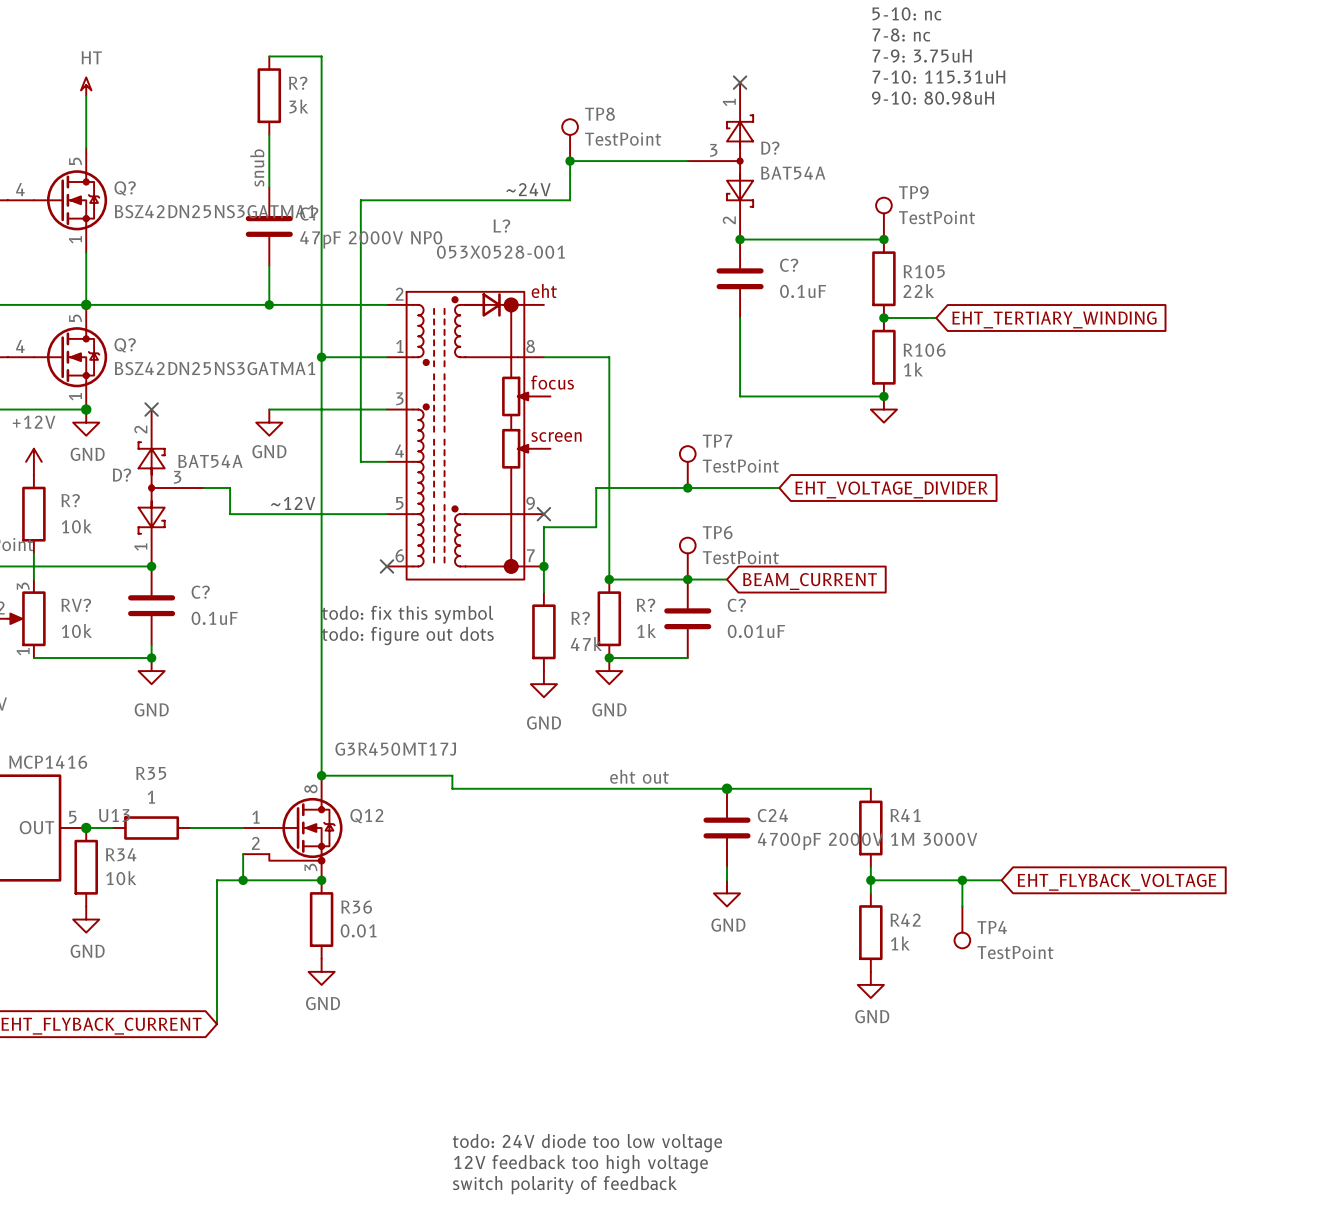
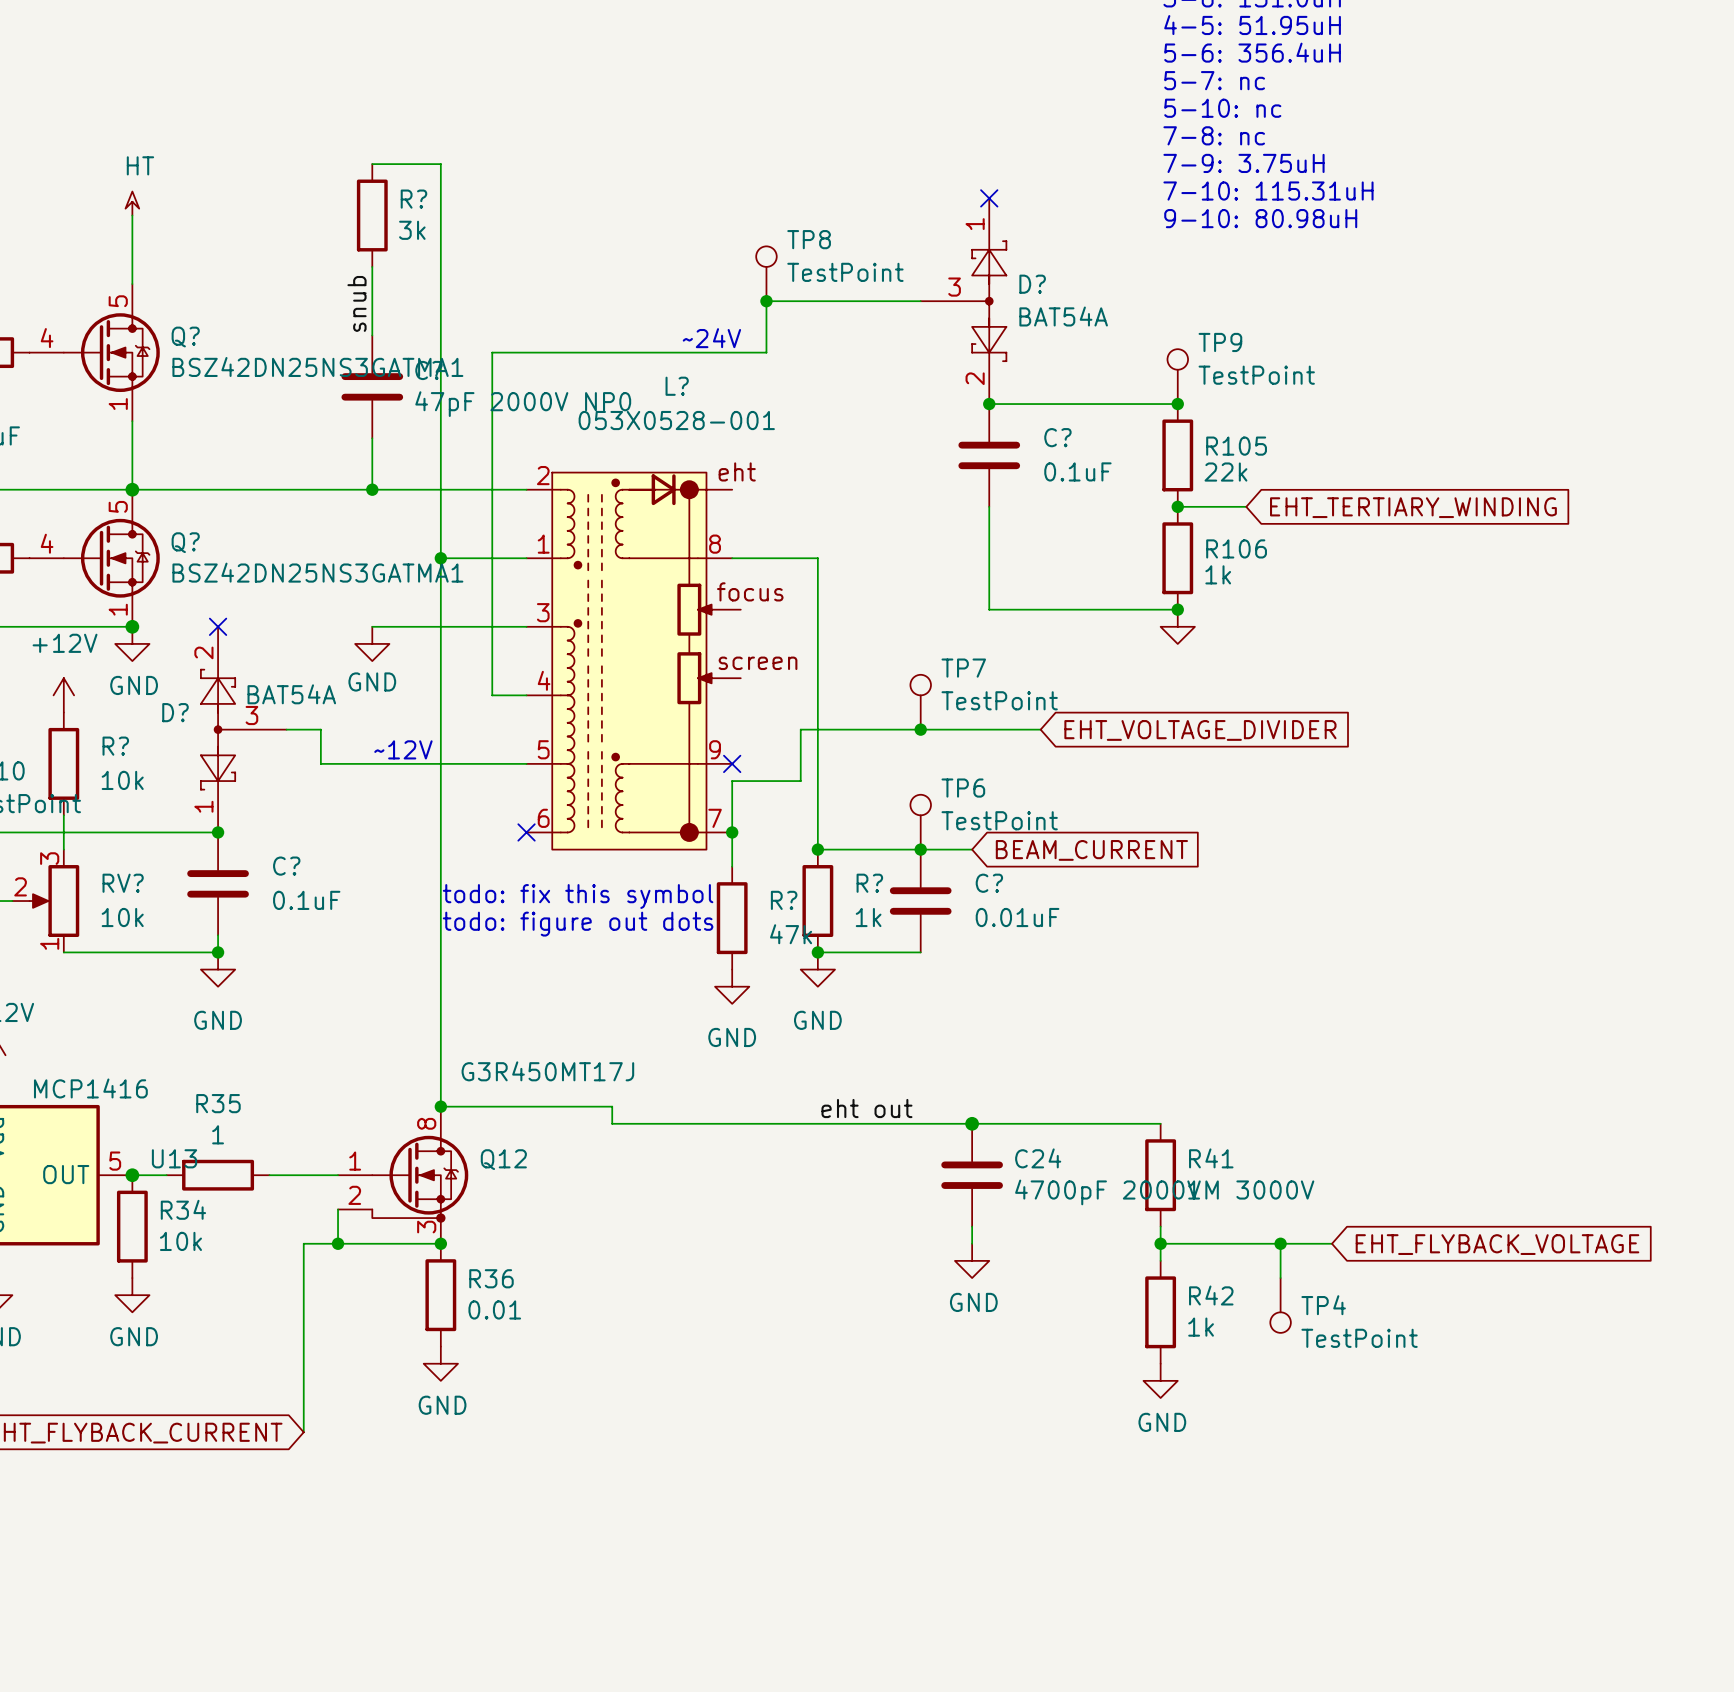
text: todo: 24V diode too low voltage (587, 1143) -> none
text: 12V feedback too high voltage (580, 1164) -> none
text: switch polarity of feedback (564, 1185) -> none

